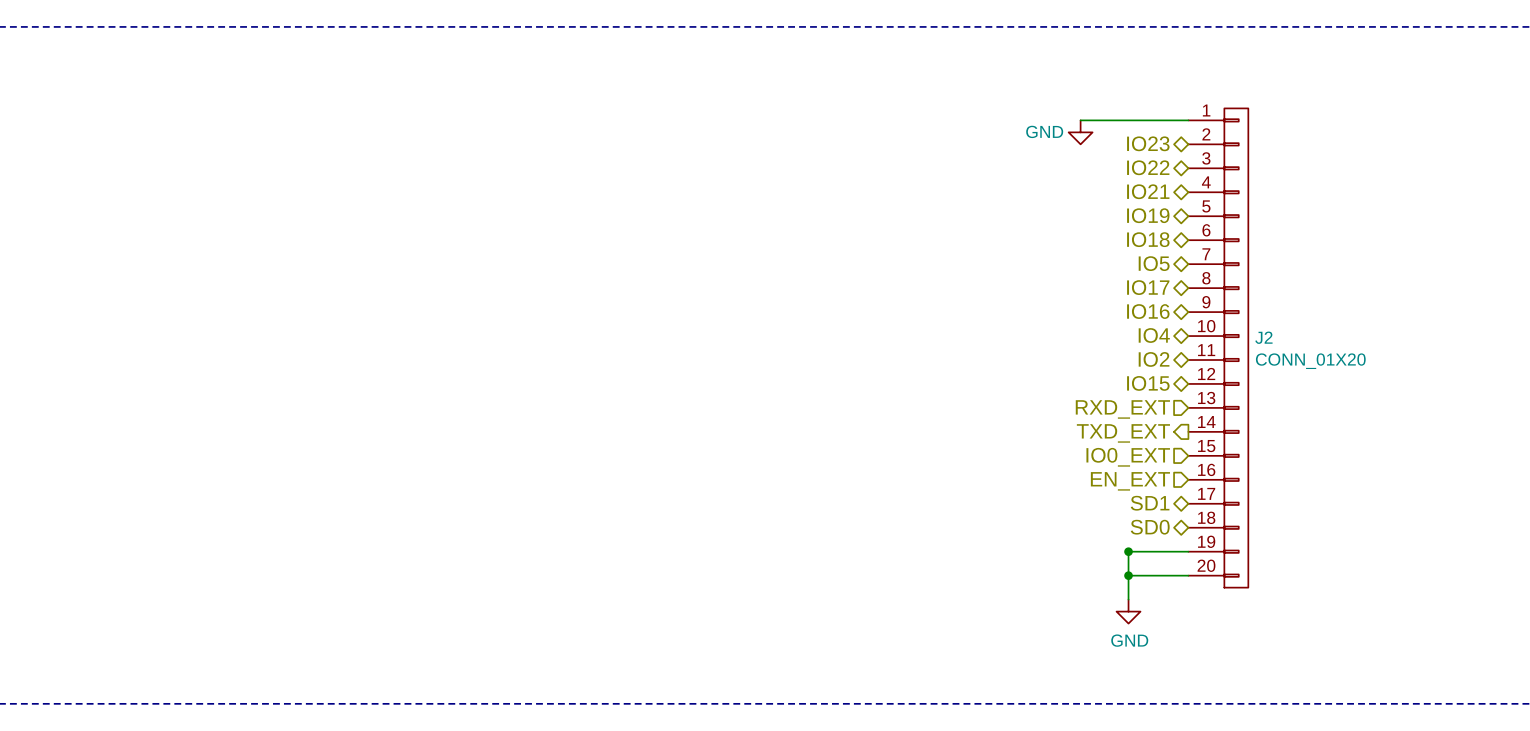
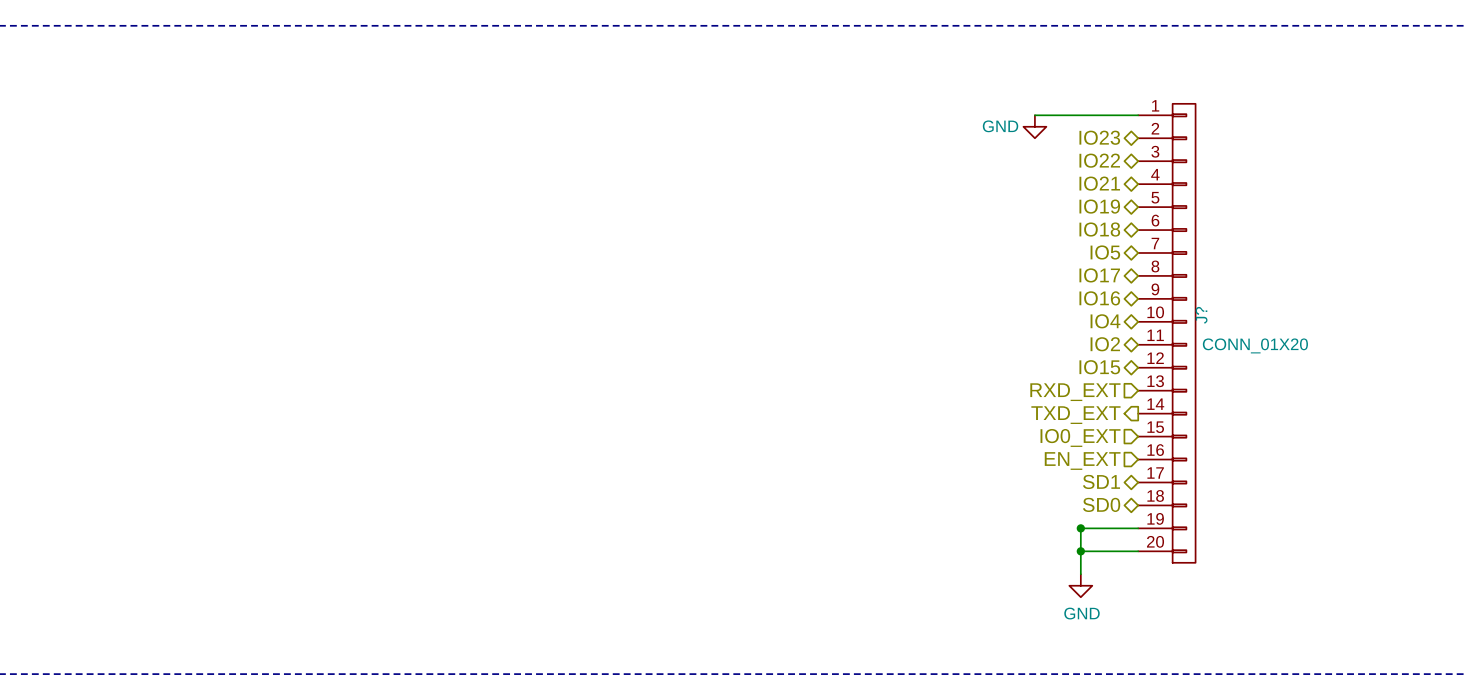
J2 name: J2 (1263, 337) -> J? (1201, 315)

